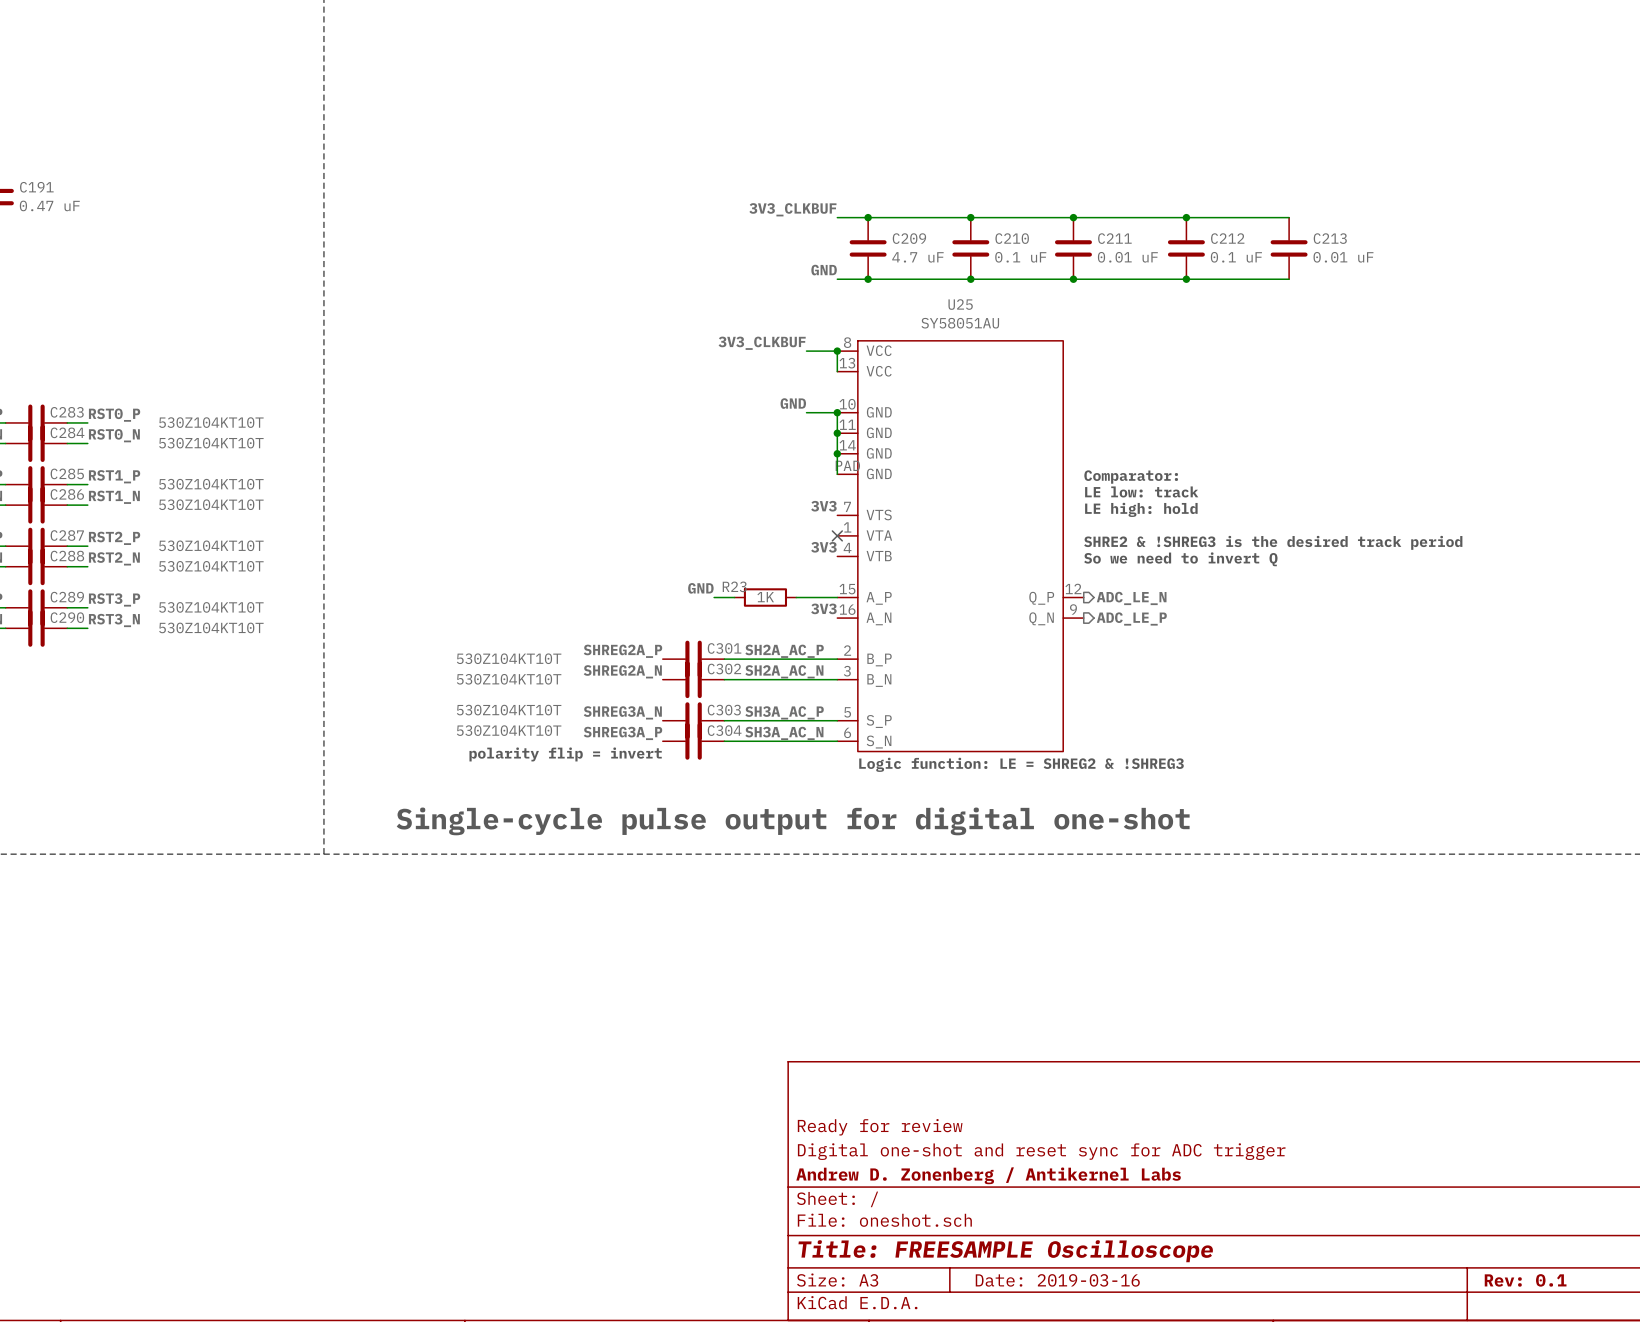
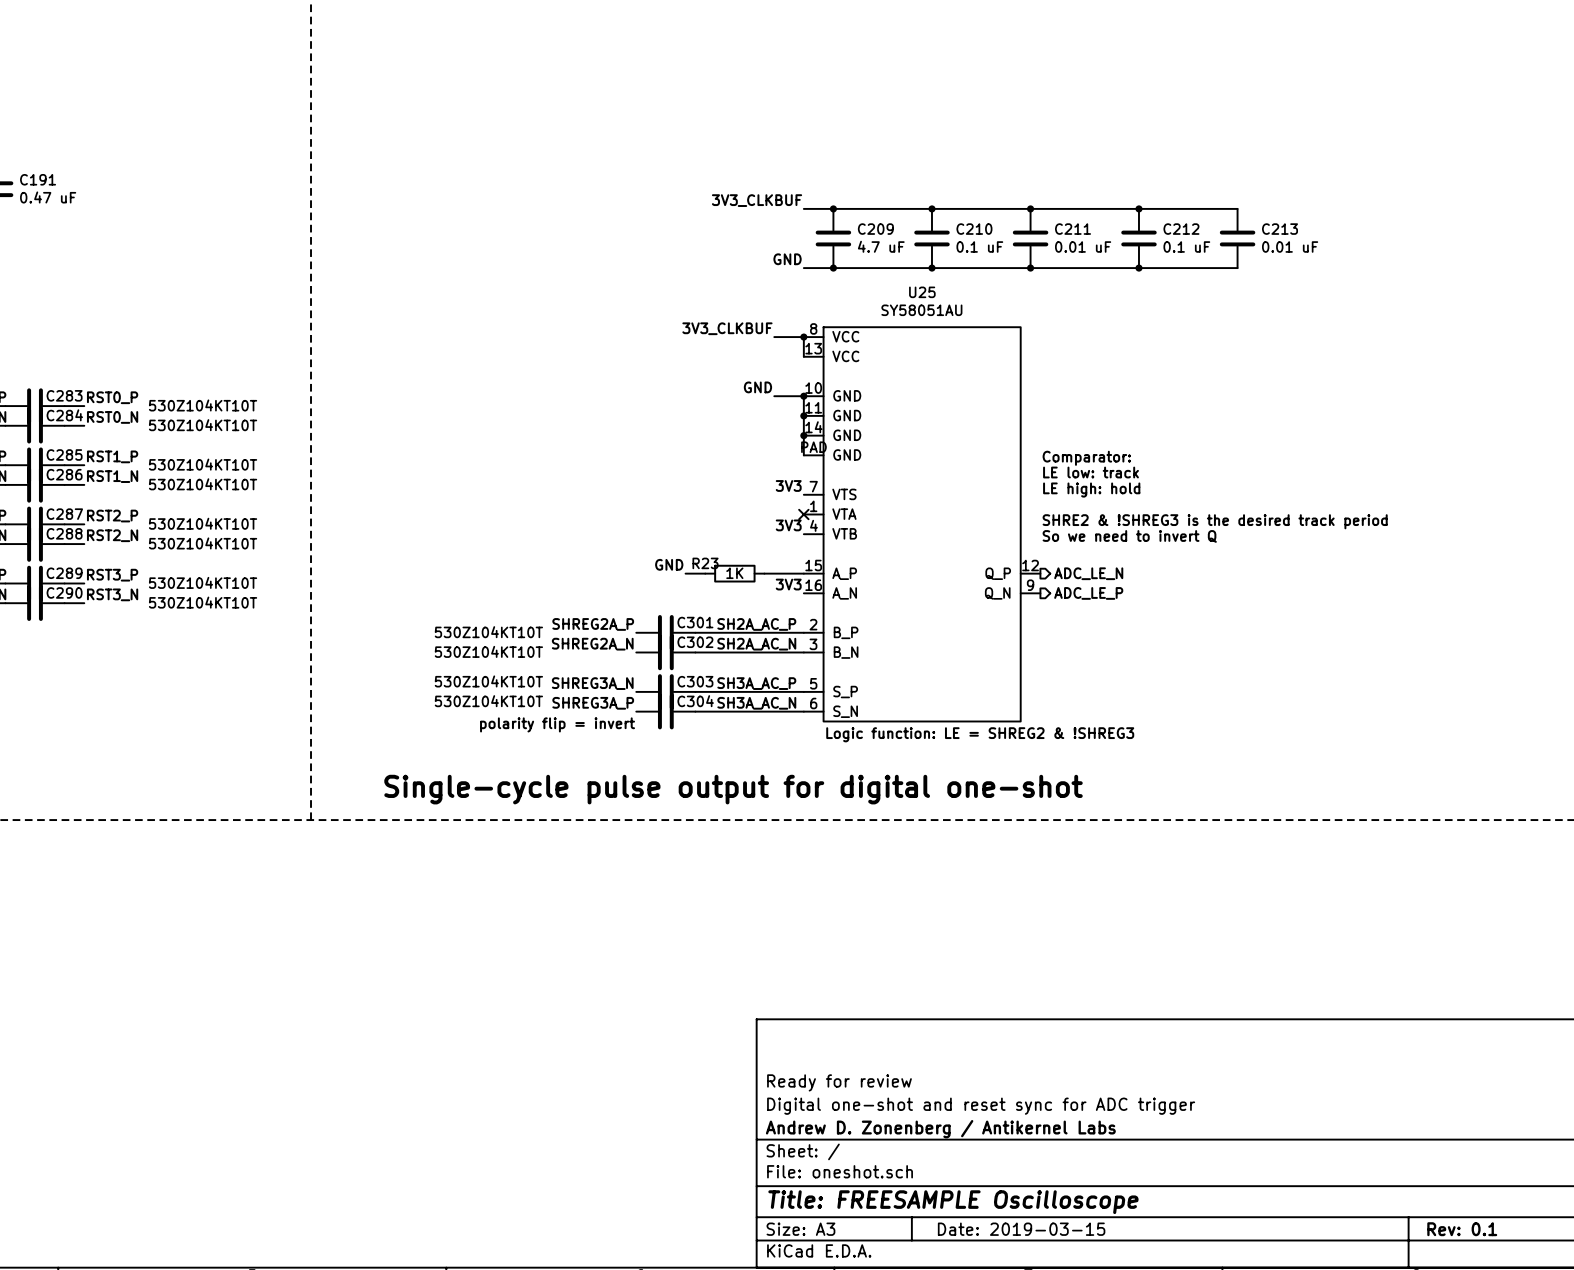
title block: Date: 2019-03-16 (1057, 1280) -> Date: 2019-03-15 (1021, 1229)

